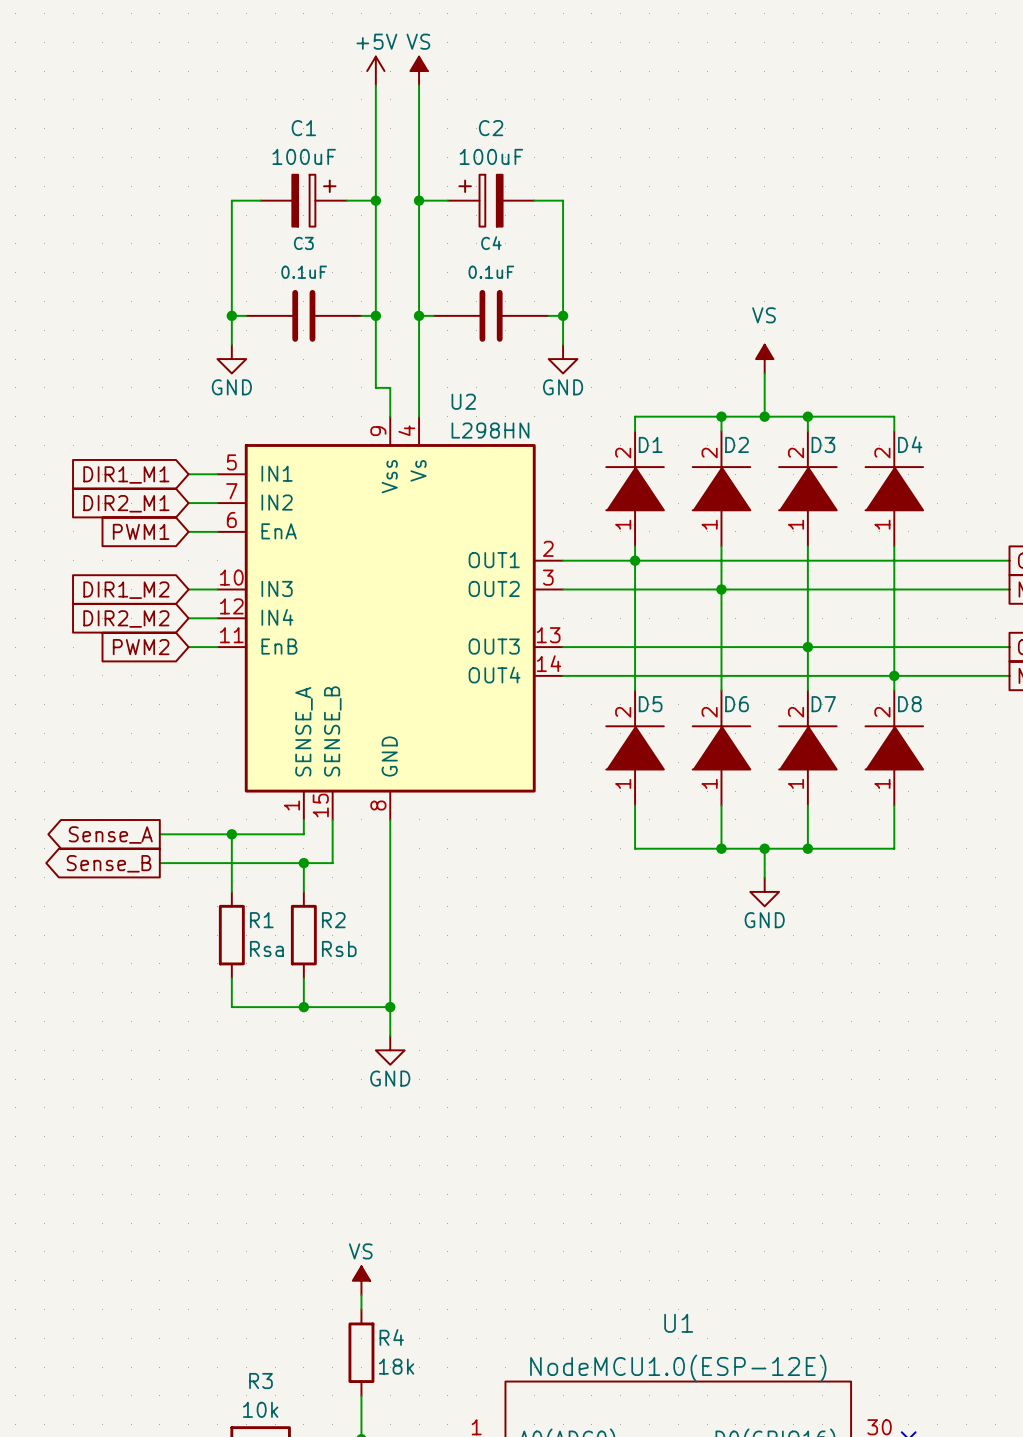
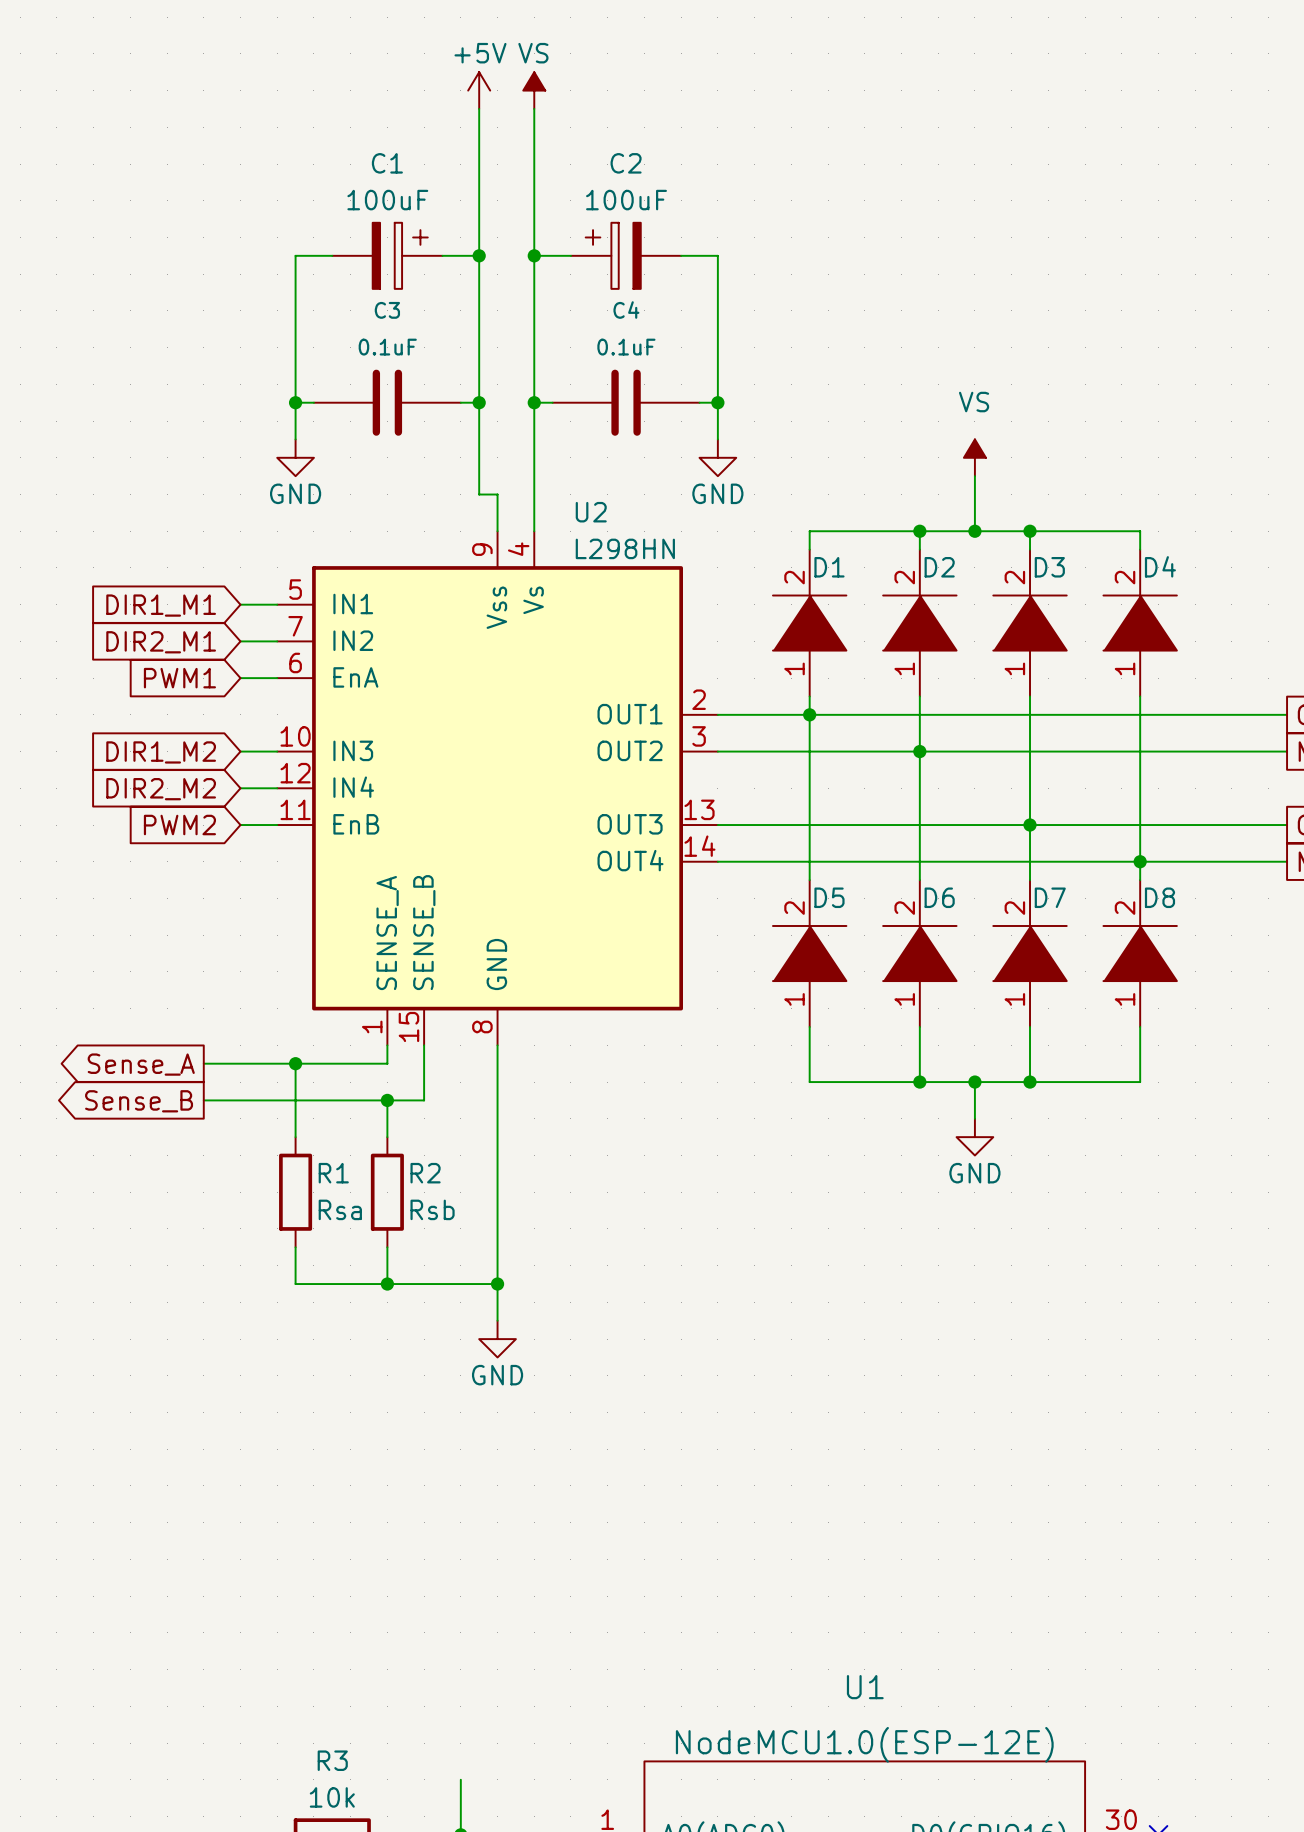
power symbol: VS (361, 1280) -> none
wire: (361, 1295) (361, 1309) -> none
R4: 18k (361, 1352) -> none

